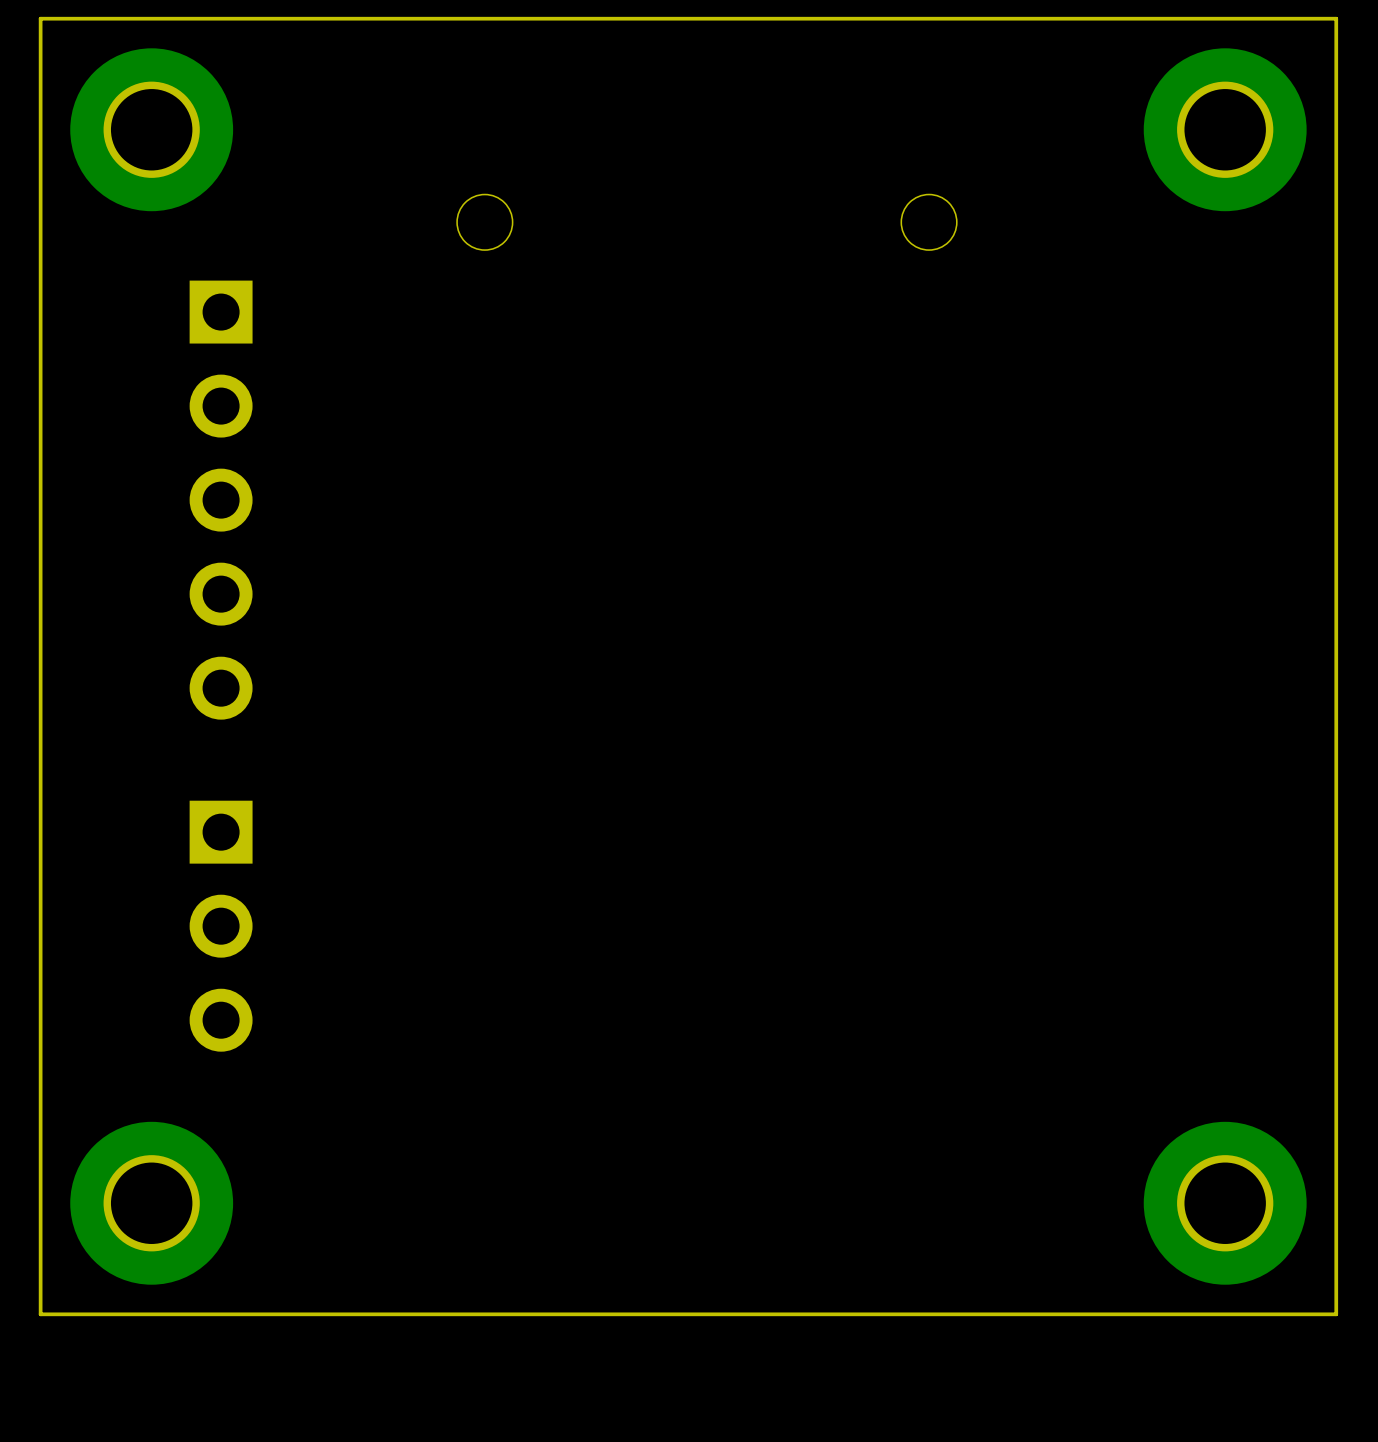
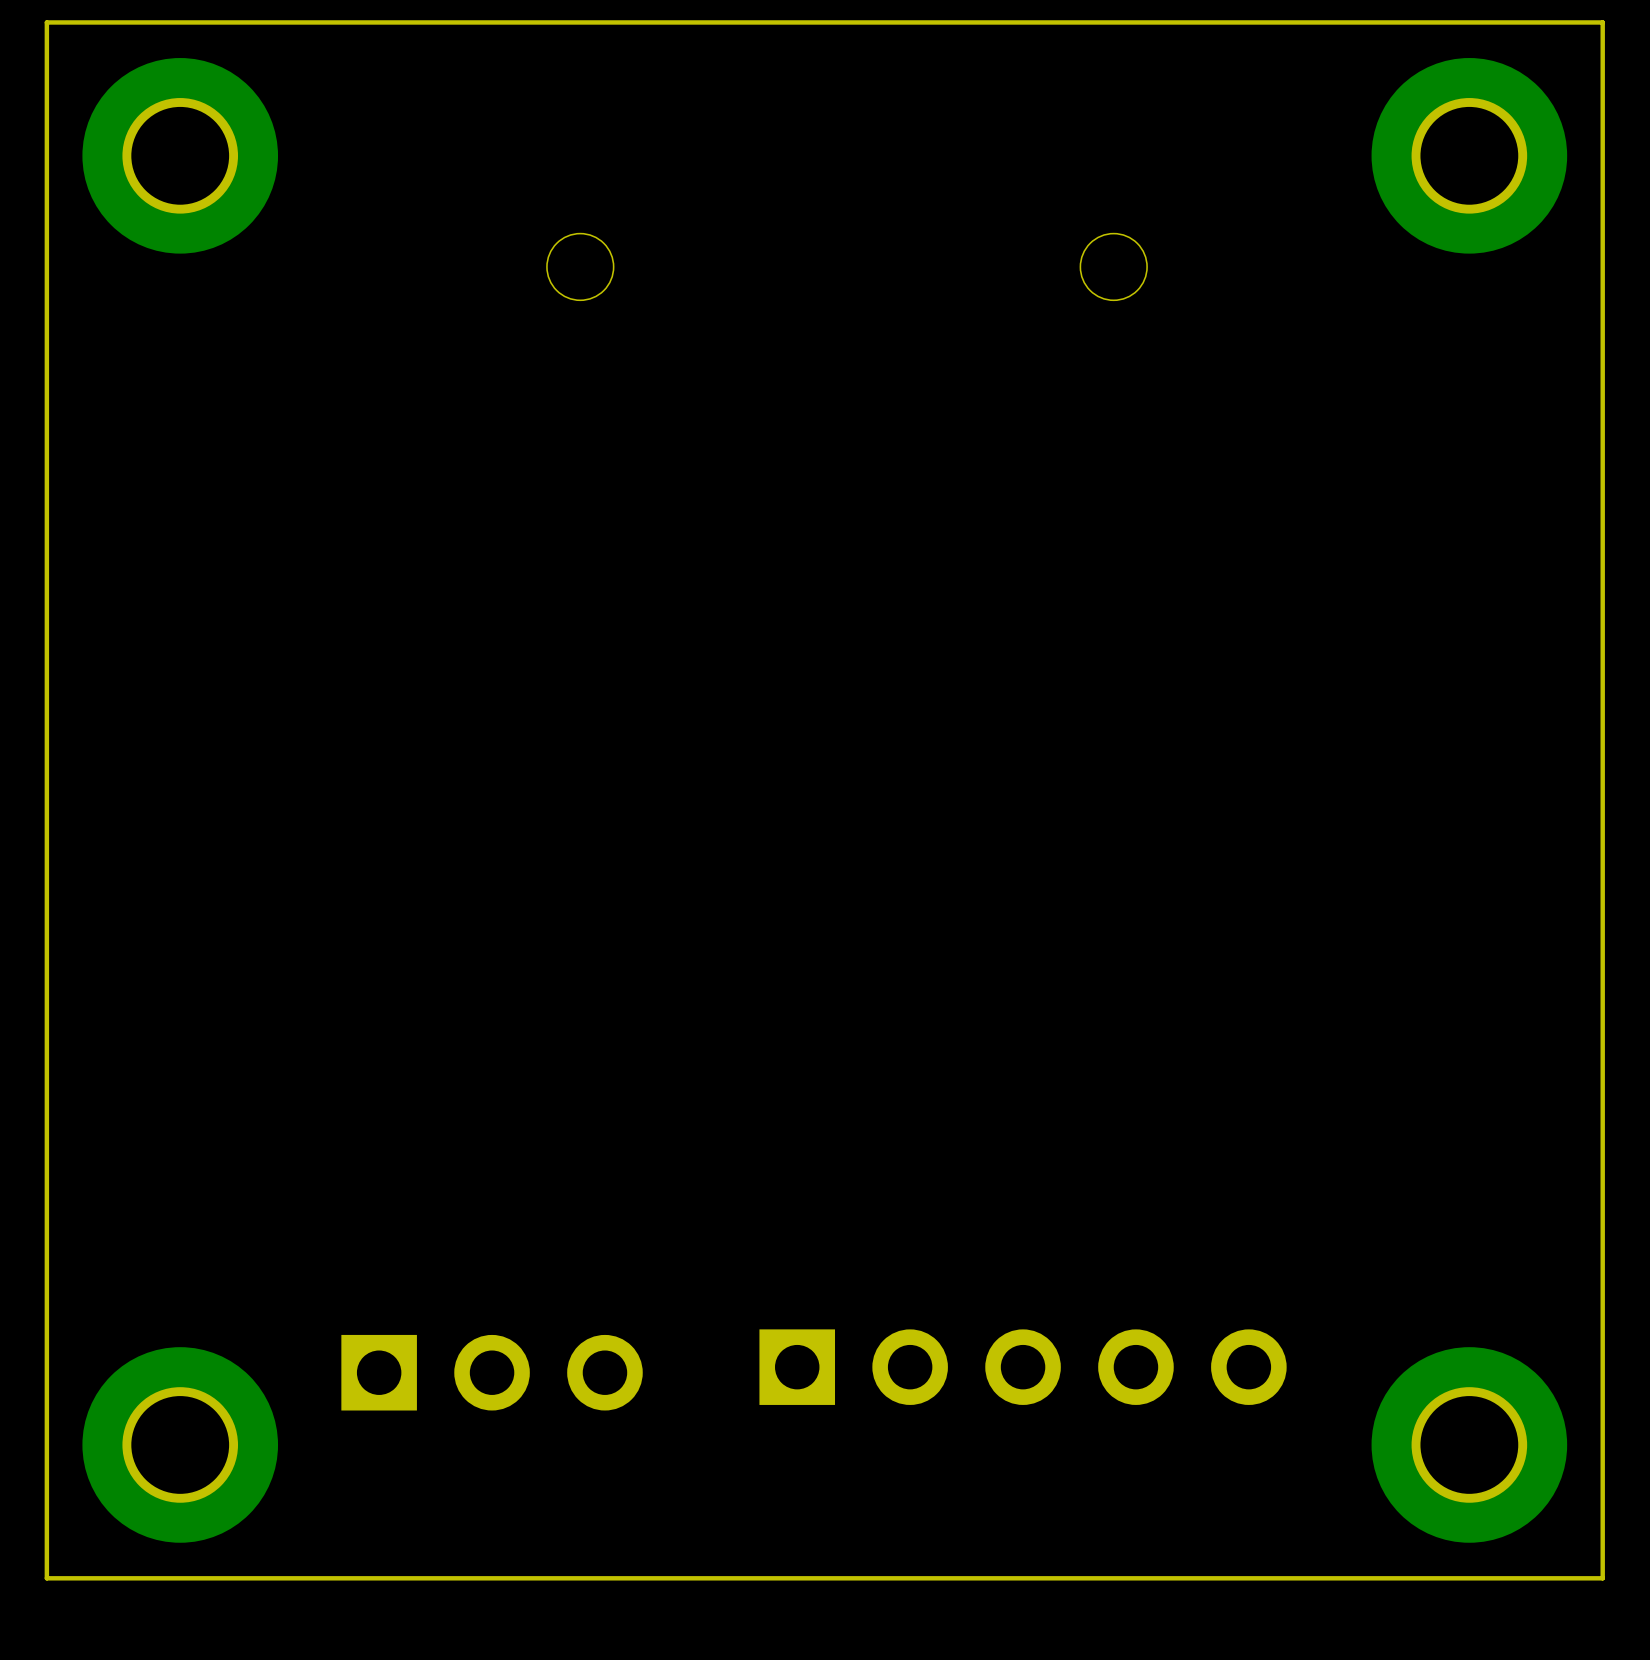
part rotation: 0° (221, 500) -> 90° counterclockwise (1023, 1367)
part position: (221, 500) -> (1023, 1367)
part rotation: 0° (221, 926) -> 90° counterclockwise (492, 1372)
part position: (221, 926) -> (492, 1372)

